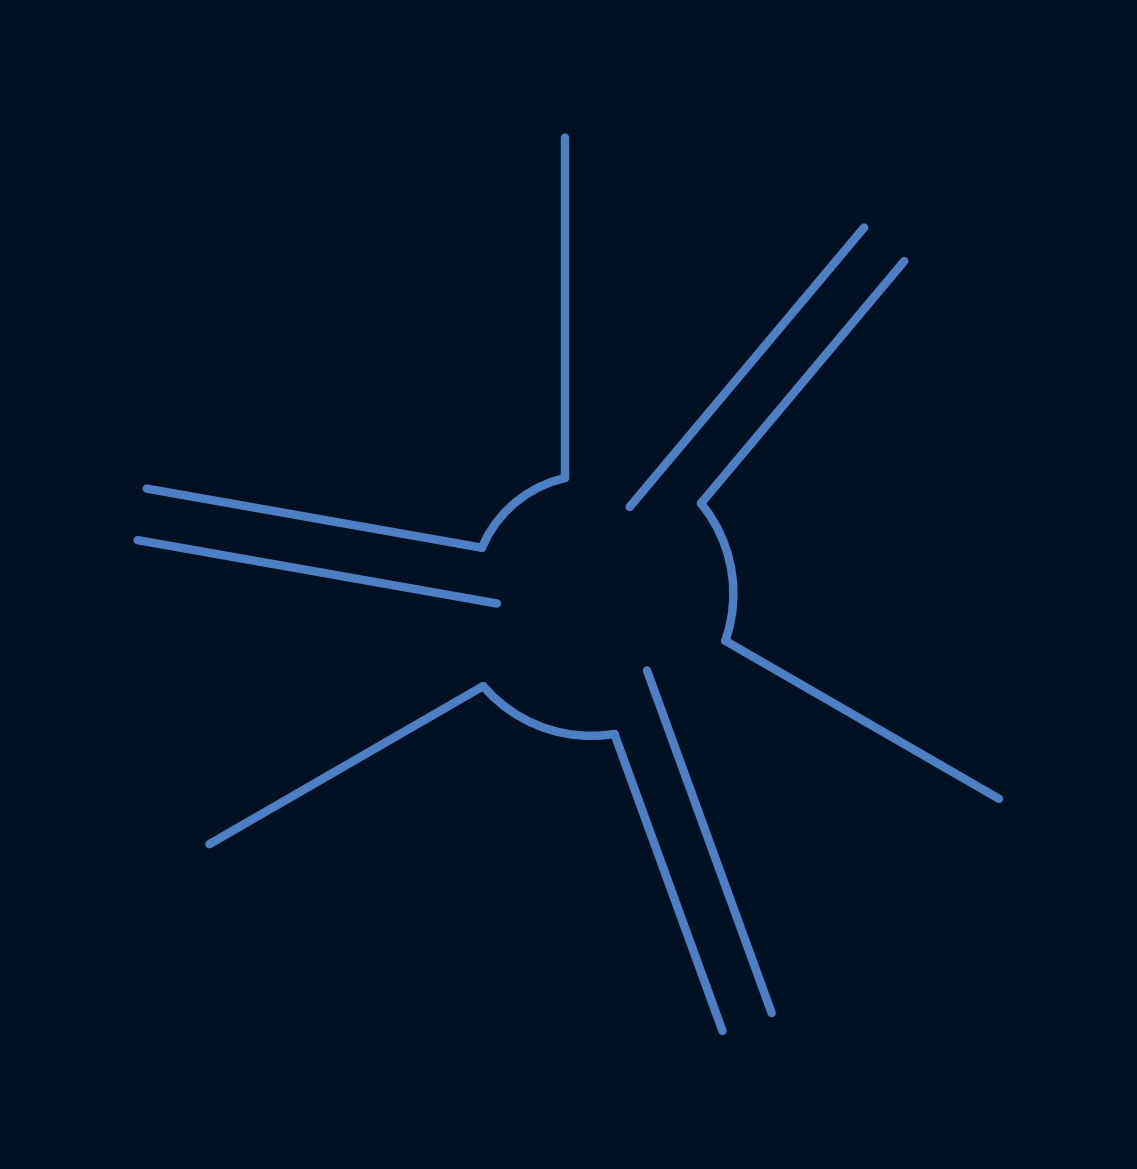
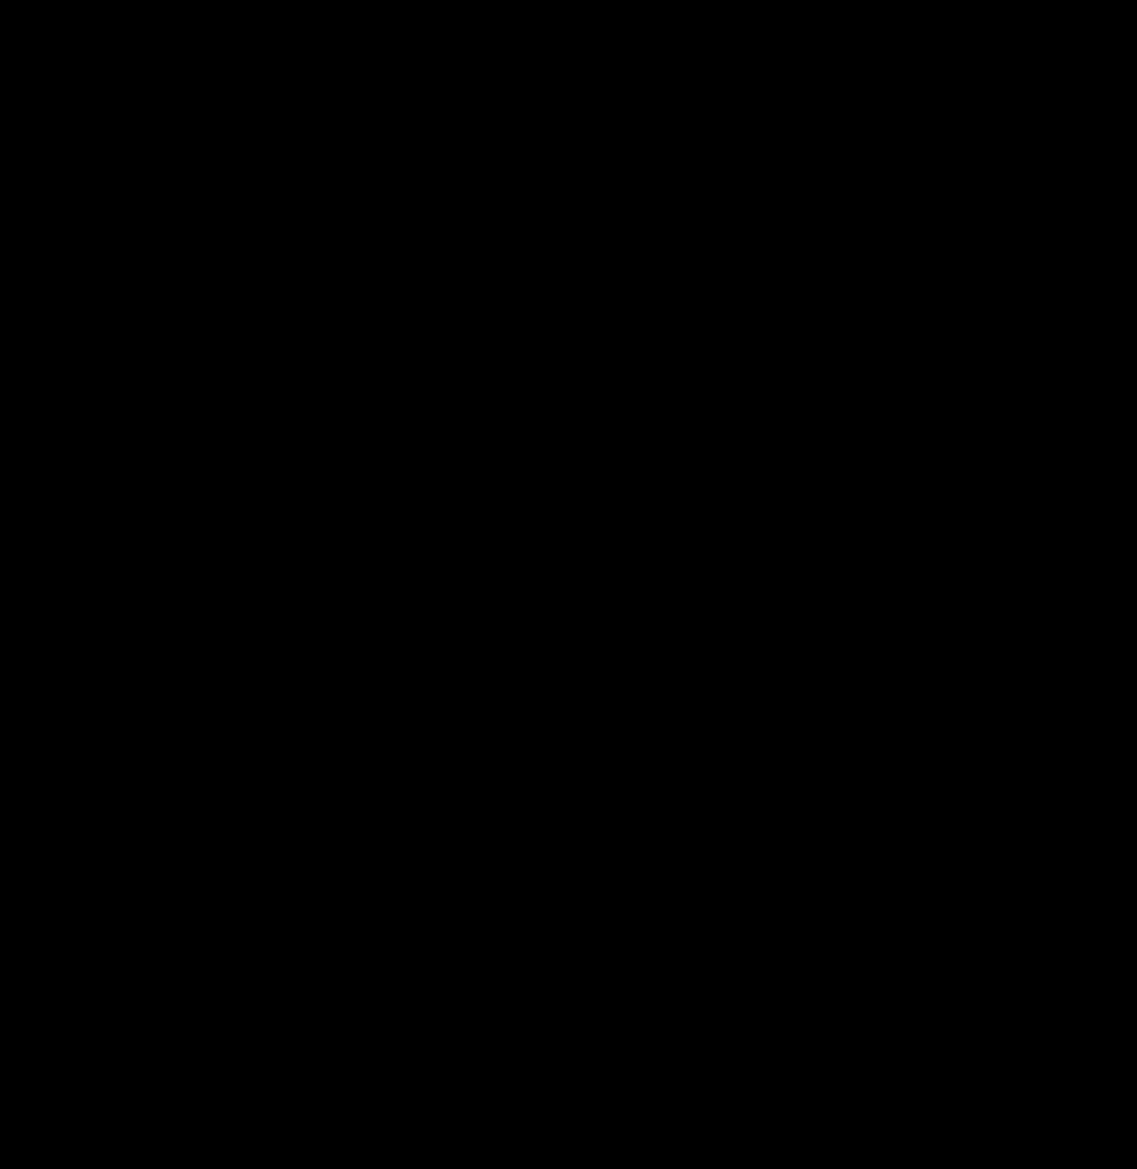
track: (564, 137) (564, 477) (538, 487) (514, 502) (495, 523) (481, 547) (146, 488) -> none
track: (864, 227) (629, 507) -> none
track: (904, 261) (701, 503) (723, 540) (731, 568) (733, 597) (725, 640) (999, 798) -> none
track: (137, 540) (496, 603) -> none
track: (646, 670) (771, 1012) -> none
track: (209, 844) (483, 686) (504, 706) (542, 727) (585, 735) (614, 734) (722, 1030) -> none

